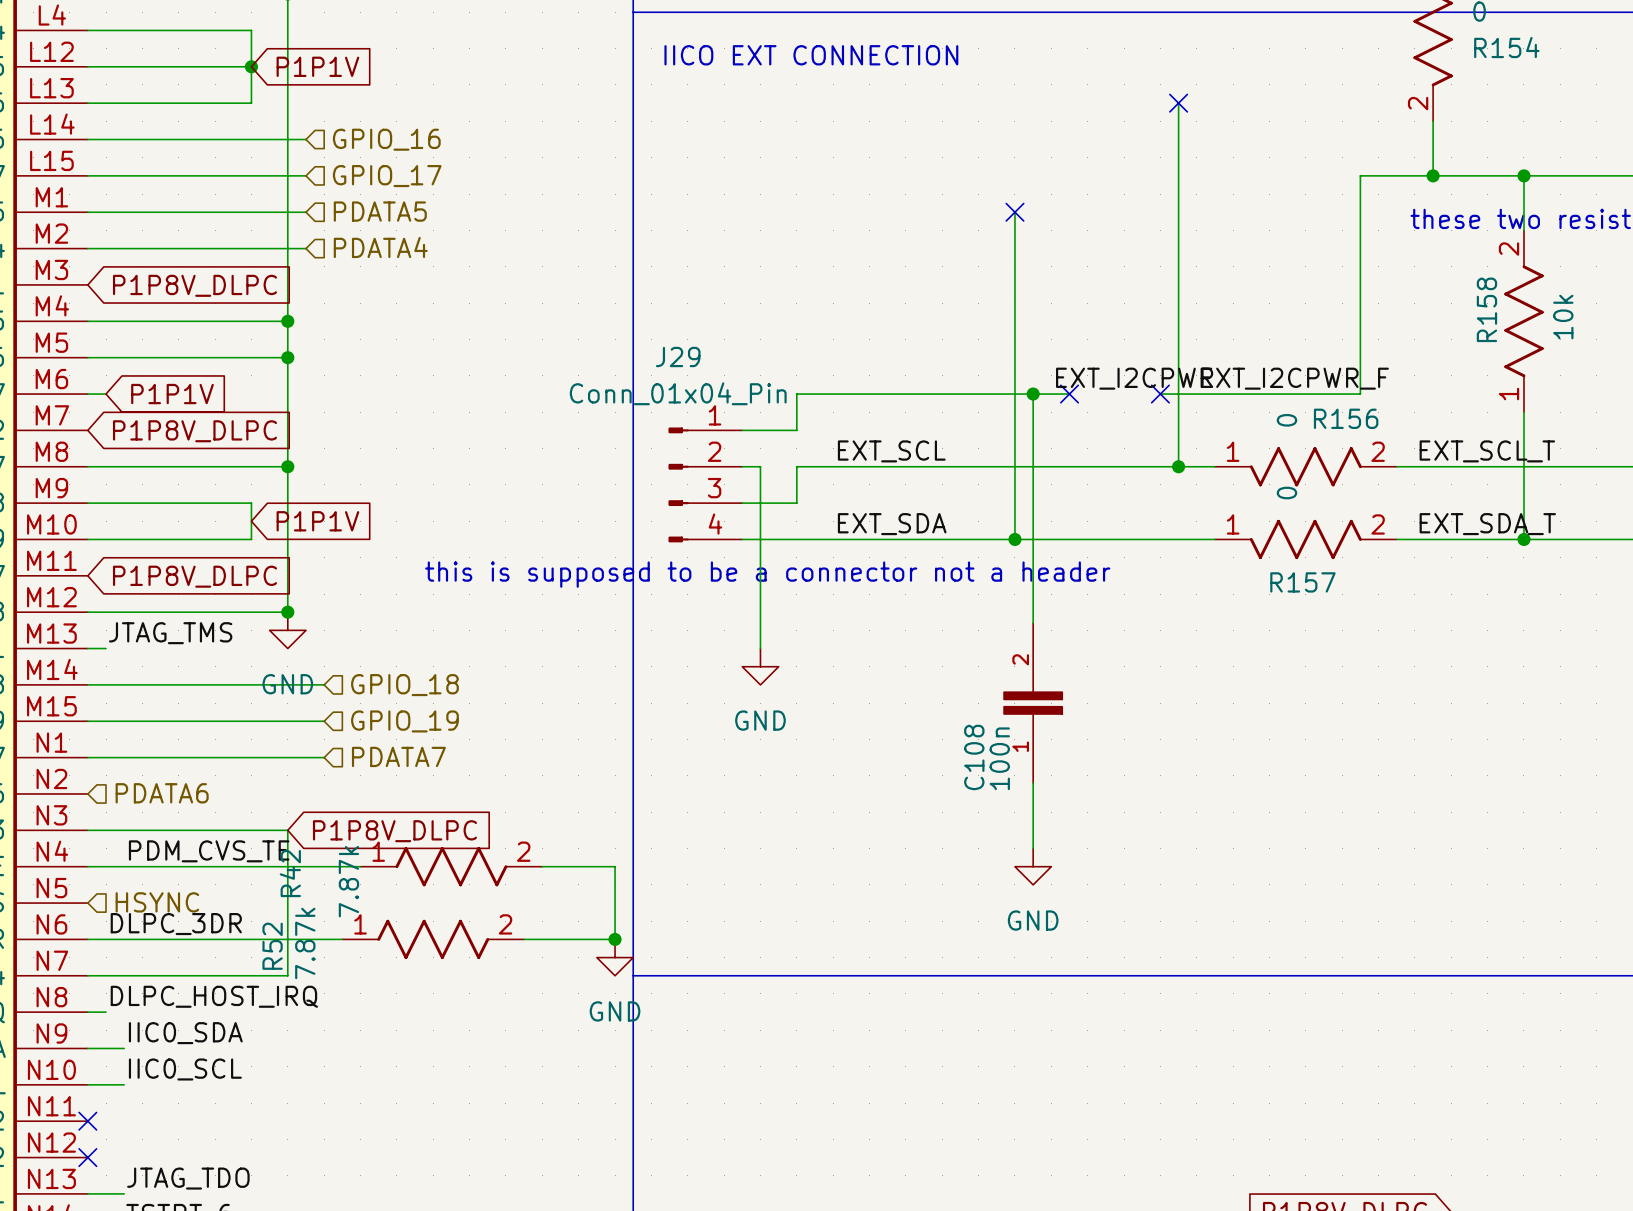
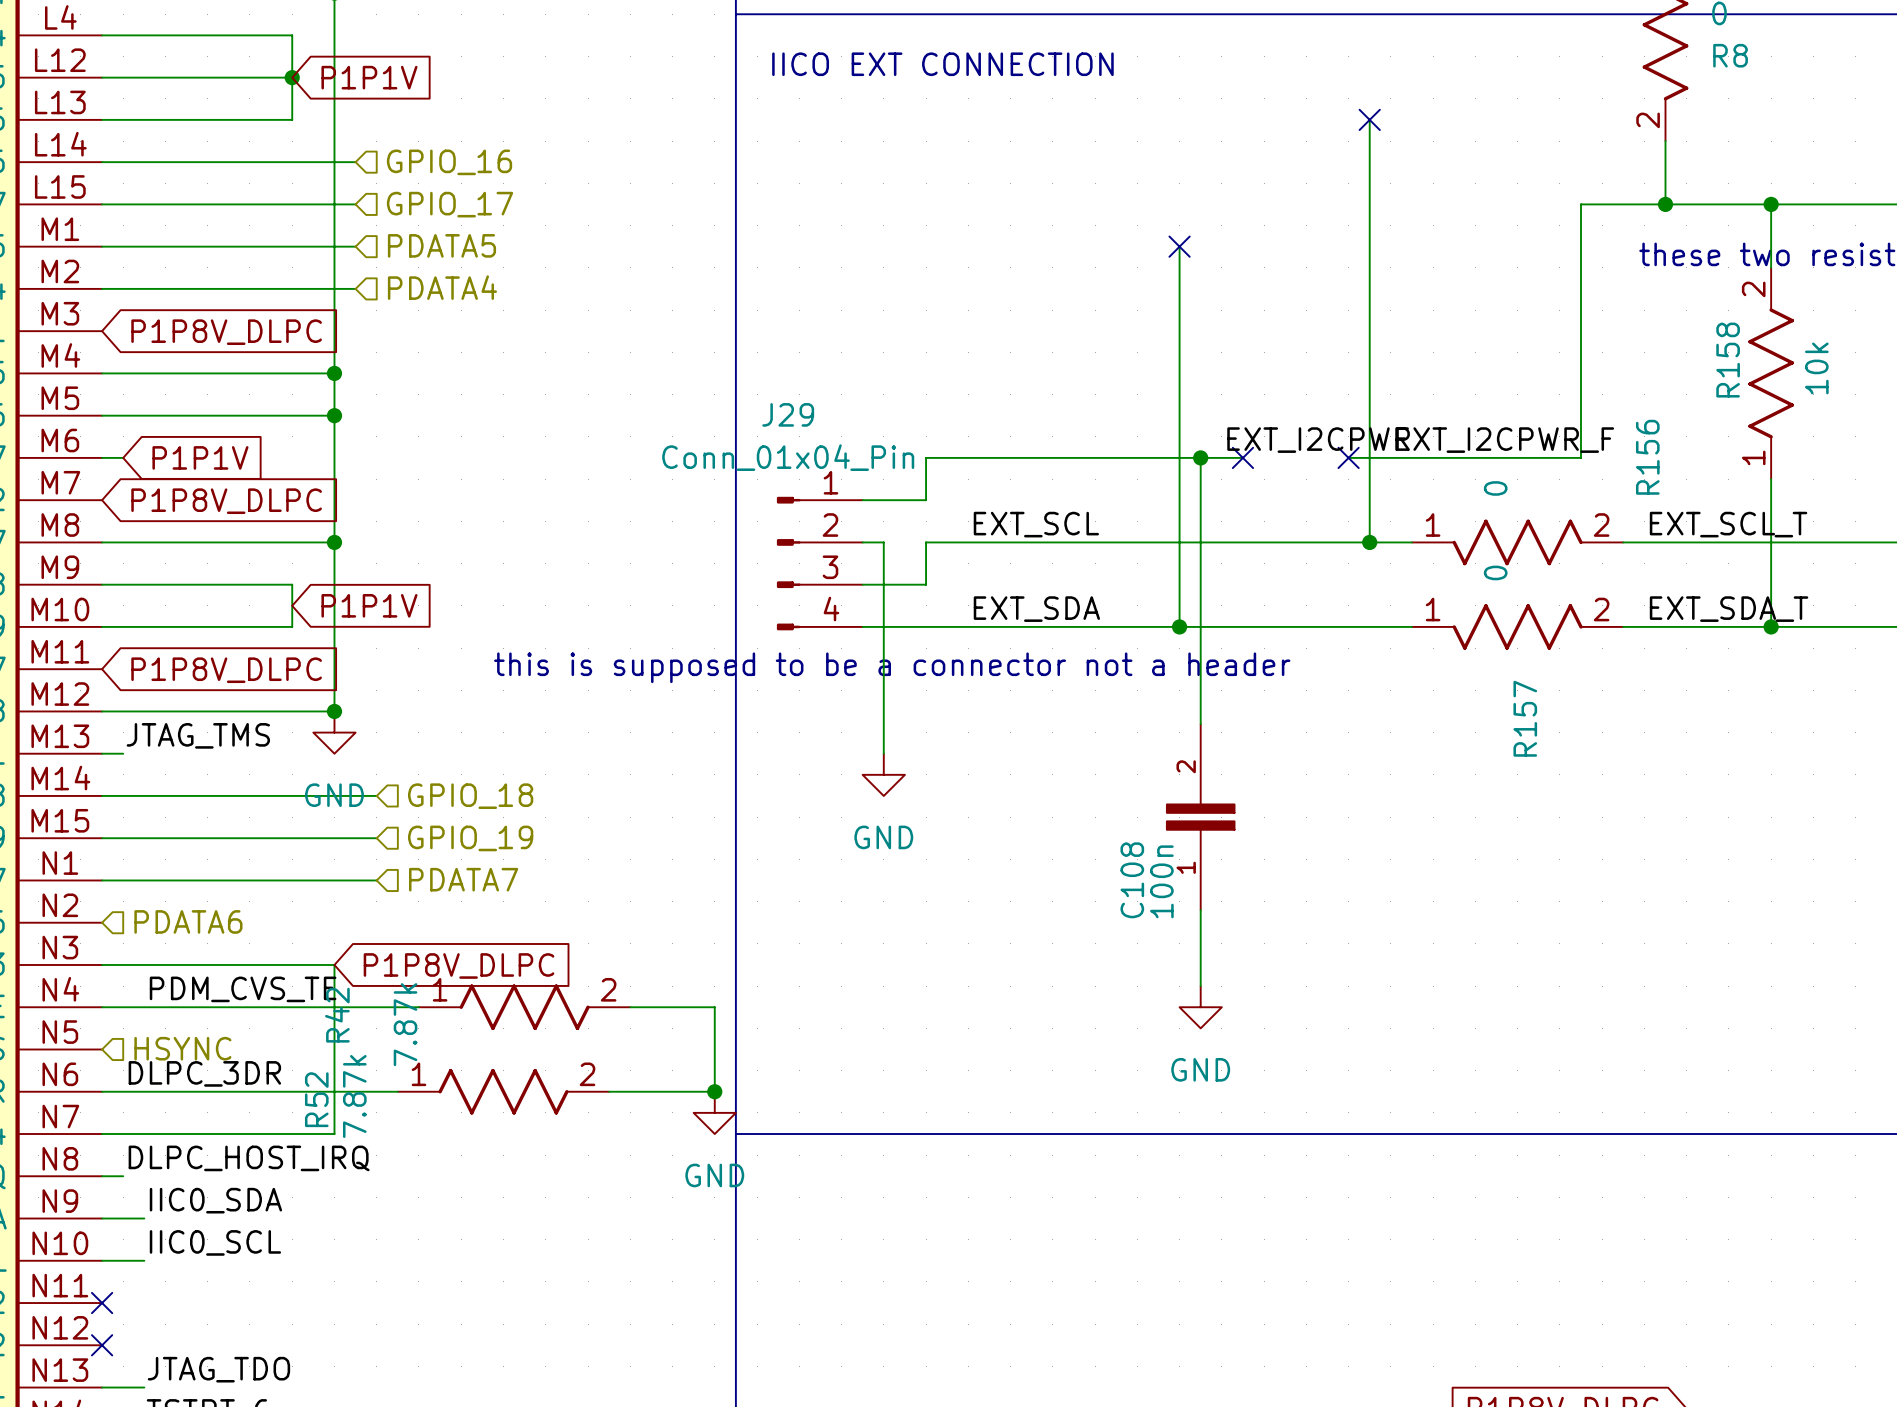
R154 name: R154 (1506, 47) -> R8 (1730, 55)
R156 name rotation: 0° (1346, 418) -> 90° counterclockwise (1647, 457)
R156 name position: R156 (1346, 418) -> R156 (1647, 457)
R157 name rotation: 0° (1302, 582) -> 90° counterclockwise (1525, 718)

